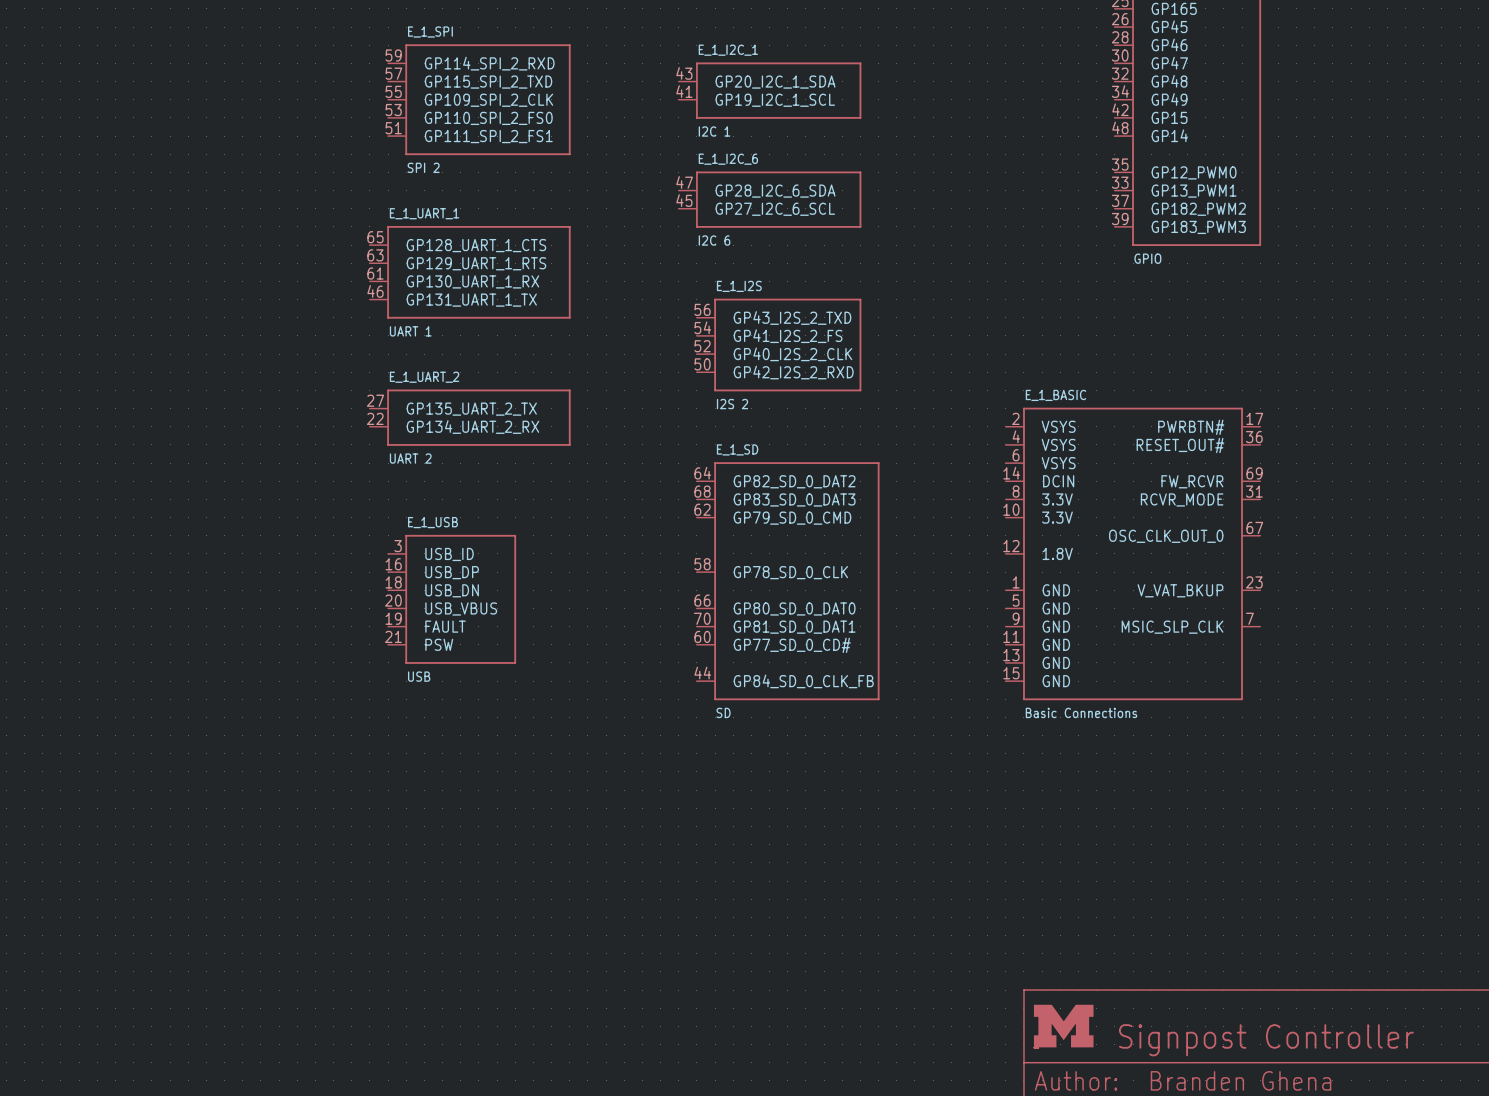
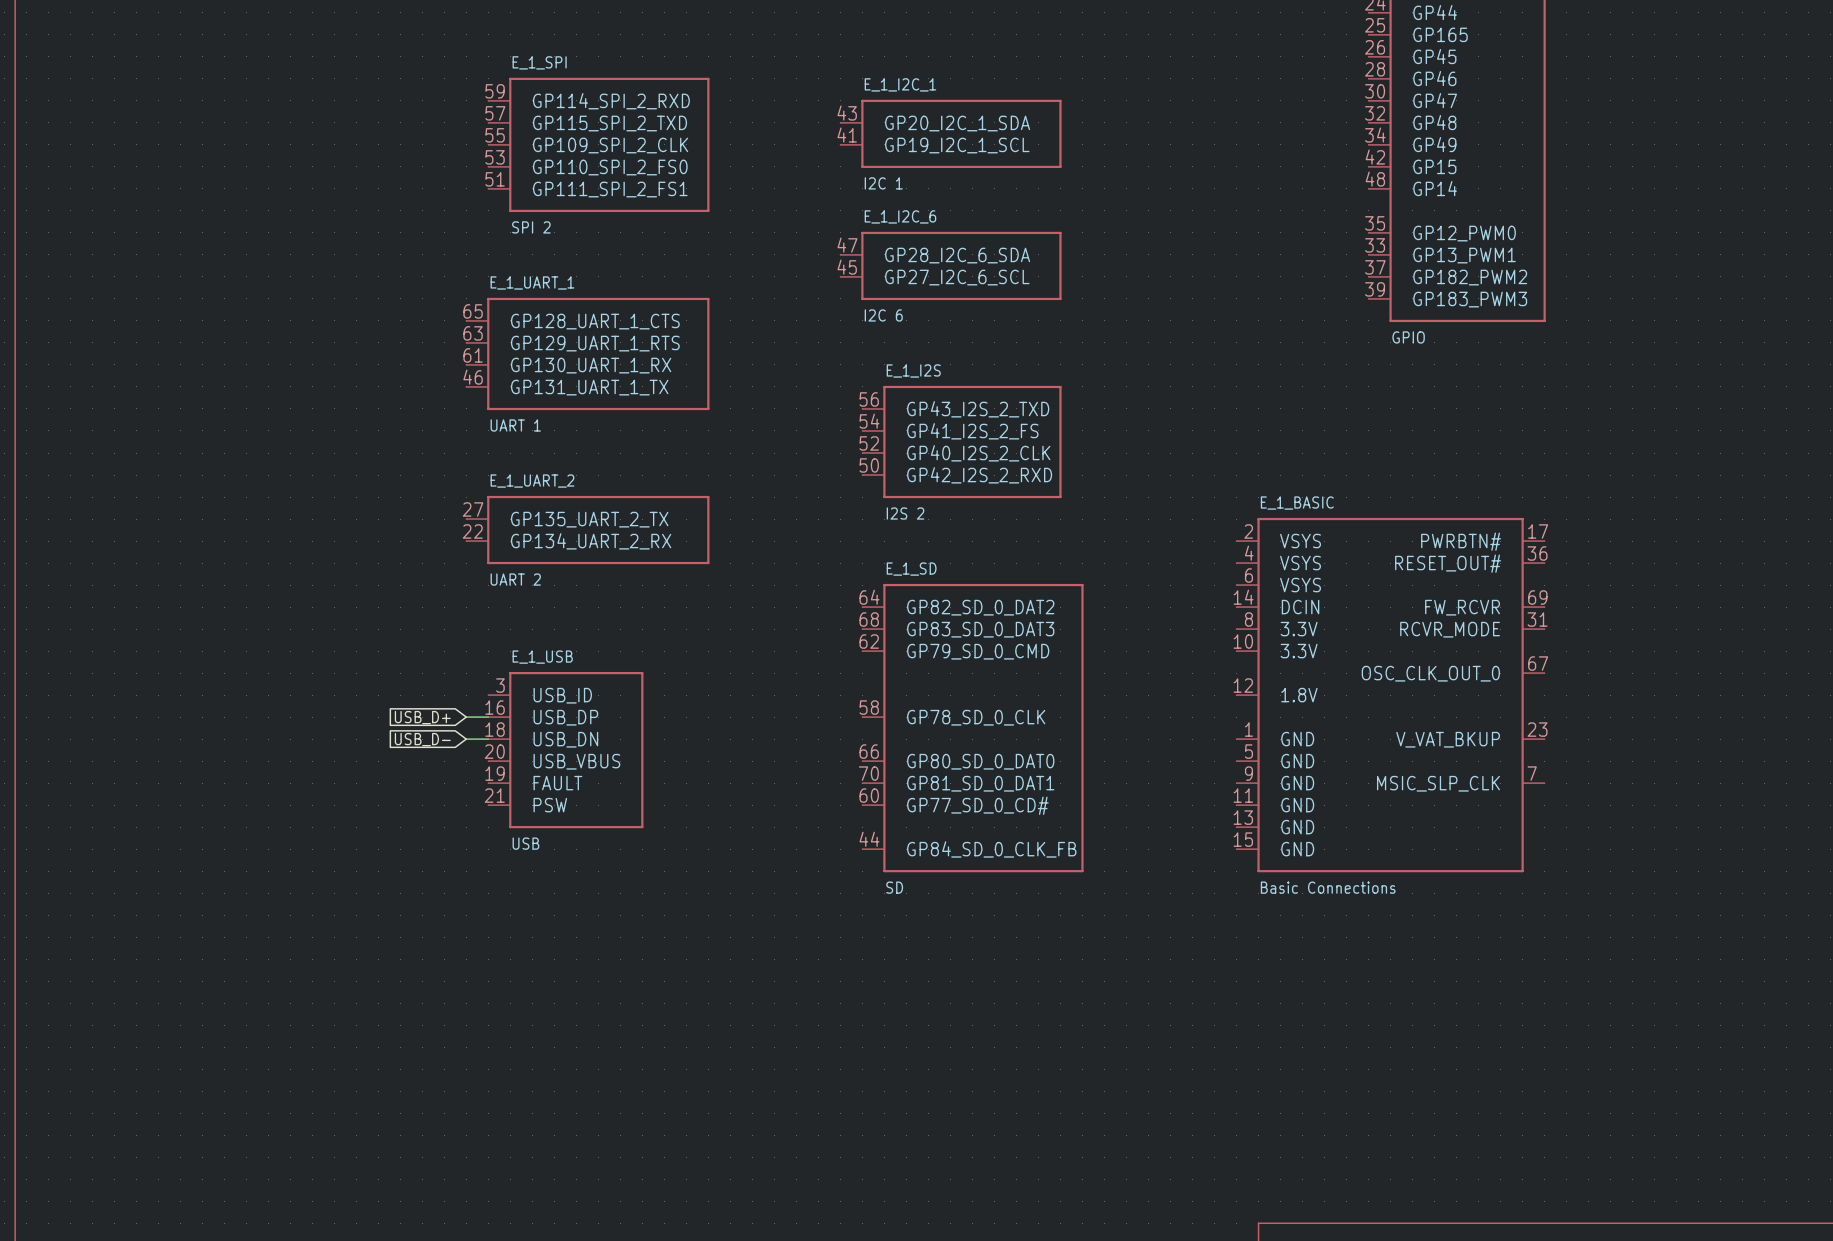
global label: none -> USB_D+ (422, 717)
wire: none -> (466, 717) (488, 717)
global label: none -> USB_D- (422, 739)
wire: none -> (466, 739) (488, 739)

